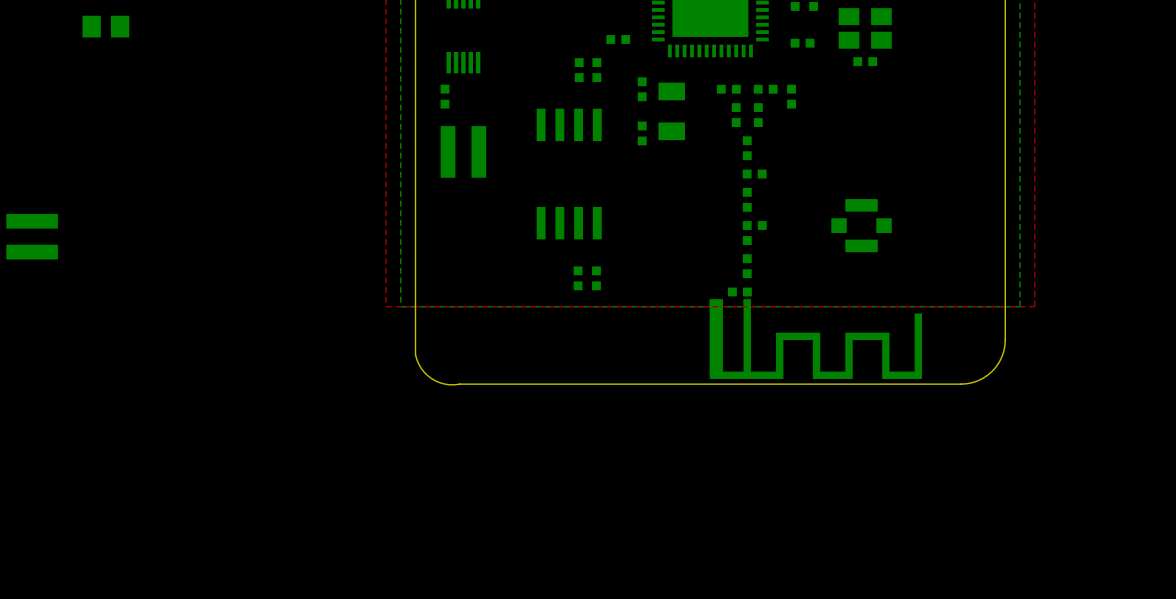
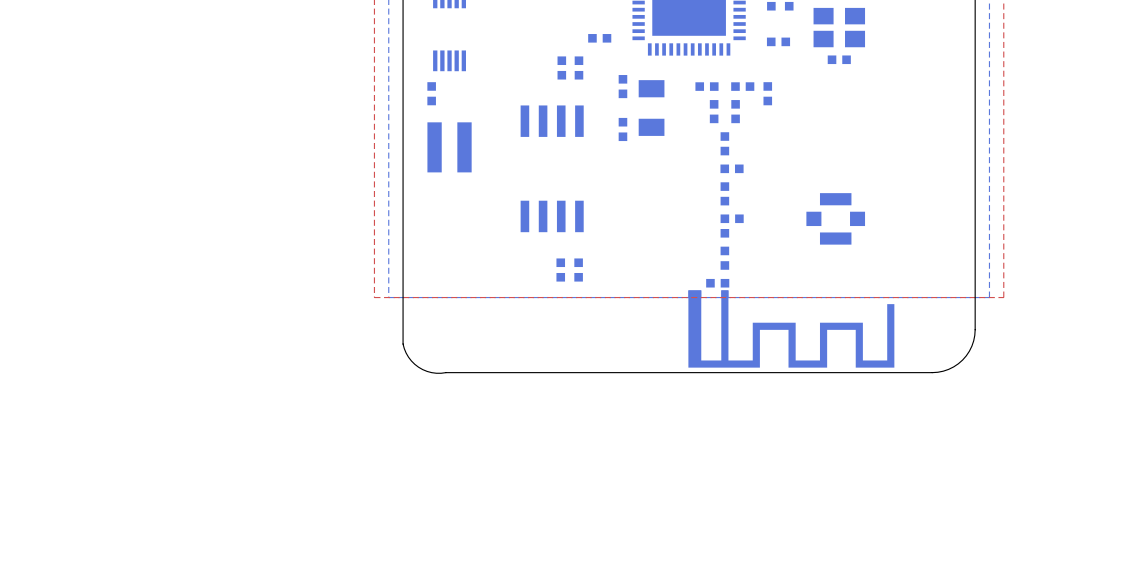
part: (105, 26) -> none
part: (32, 236) -> none

